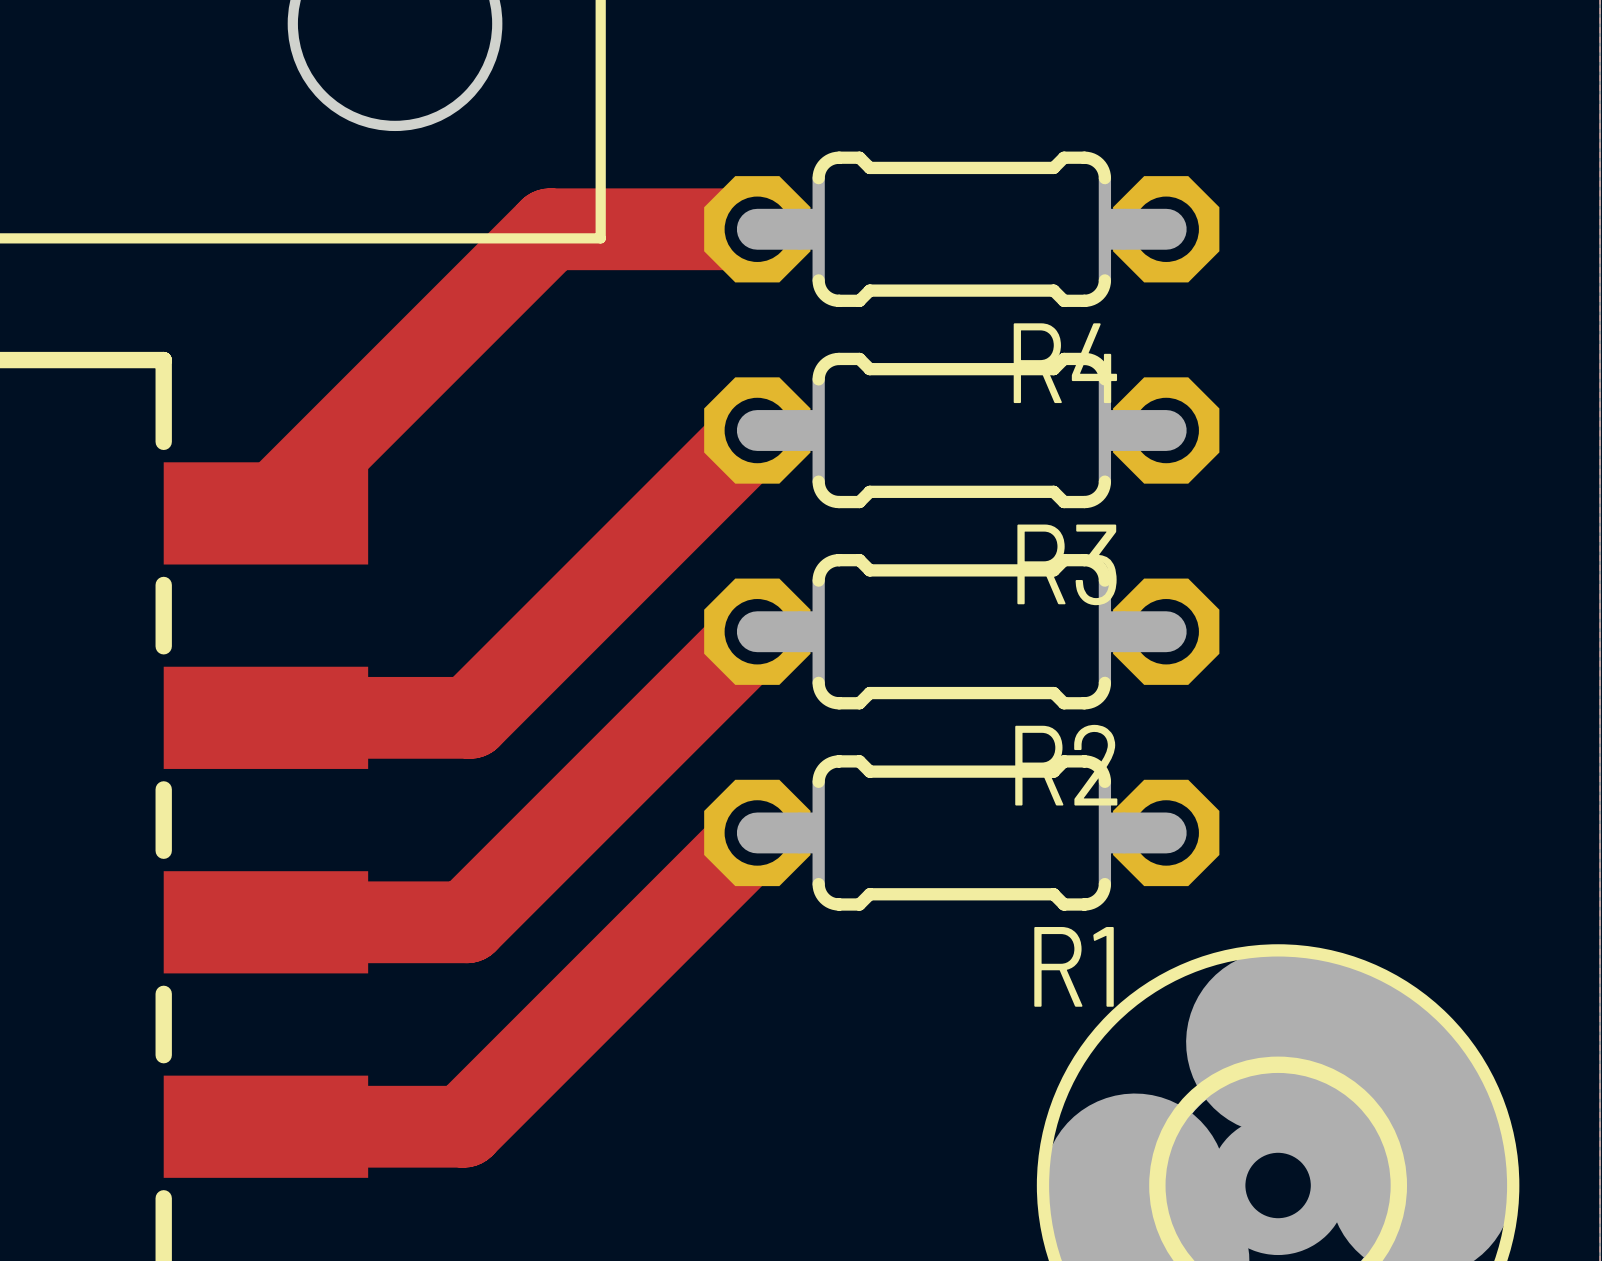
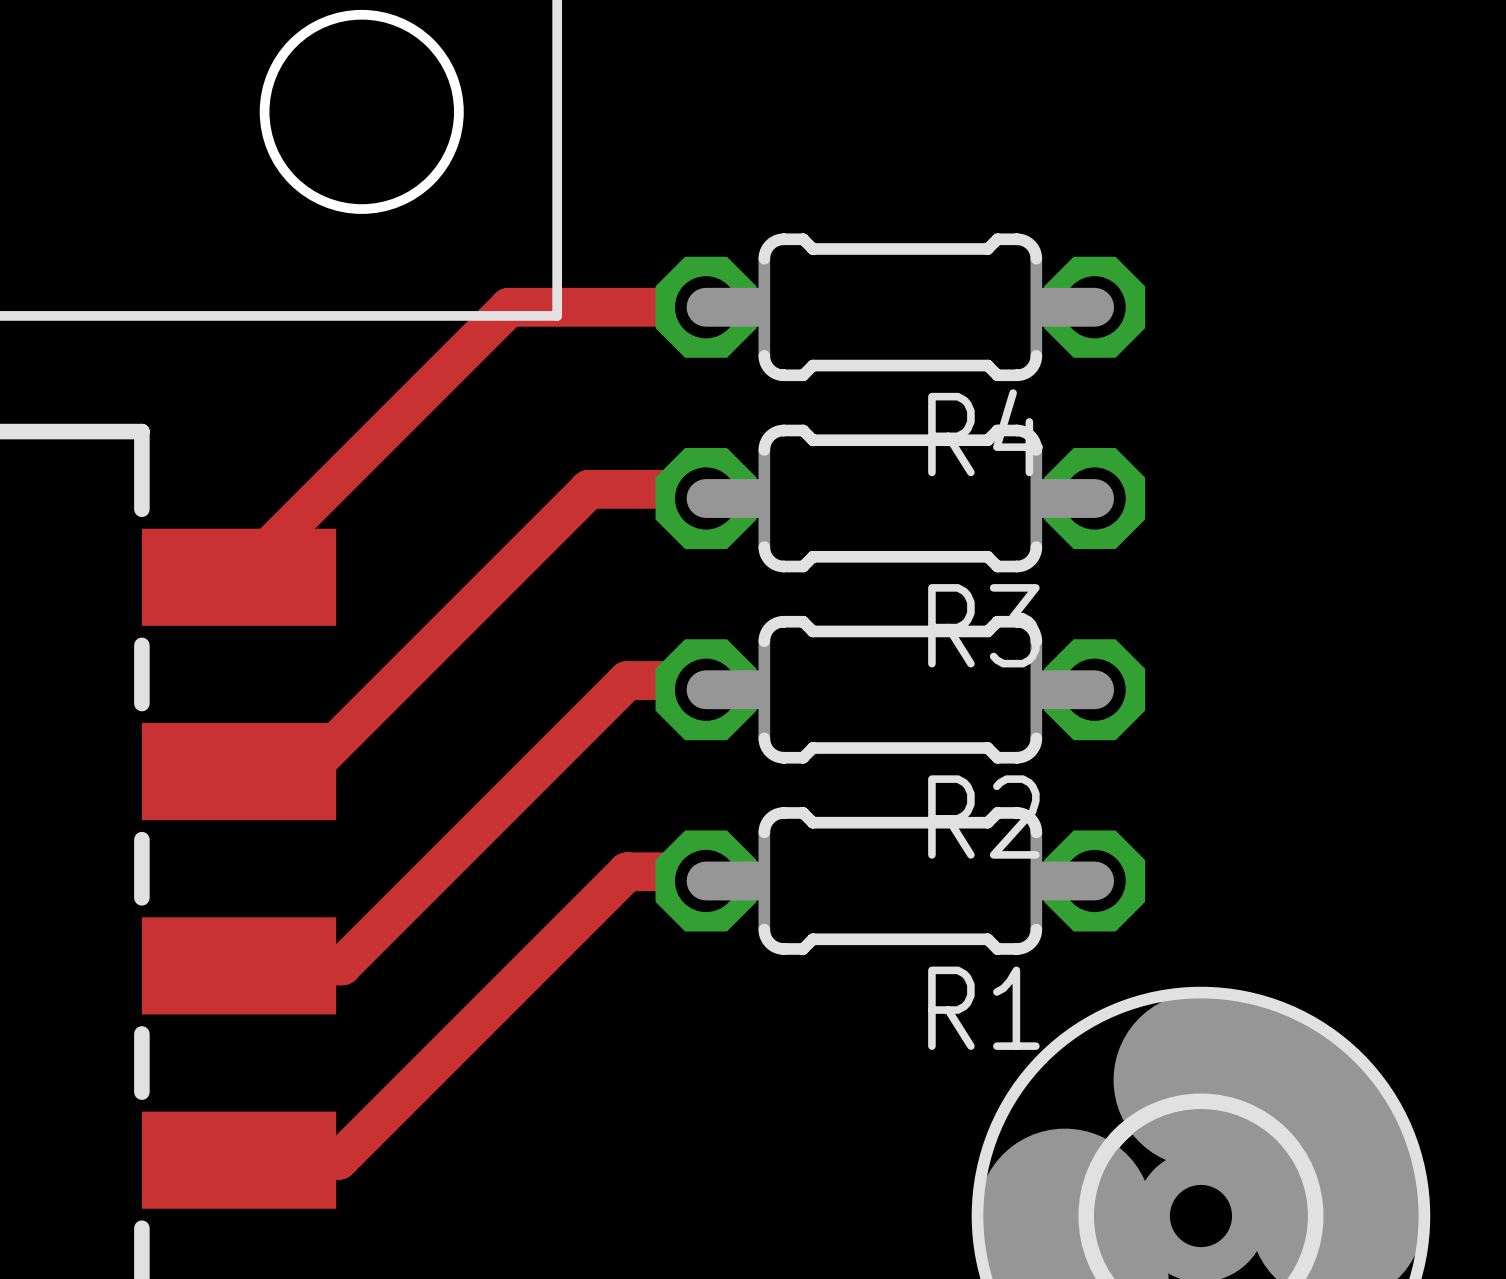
track width: thick (757, 229) (550, 229) (265, 513) -> thin (706, 307) (509, 307) (239, 577)
track: (757, 430) (469, 717) (337, 717) -> (706, 498) (696, 489) (589, 489) (306, 771)
track: (757, 631) (466, 922) (374, 922) -> (706, 689) (696, 680) (627, 680) (341, 965)
track: (757, 832) (463, 1126) (370, 1126) -> (706, 880) (696, 871) (627, 871) (338, 1160)

